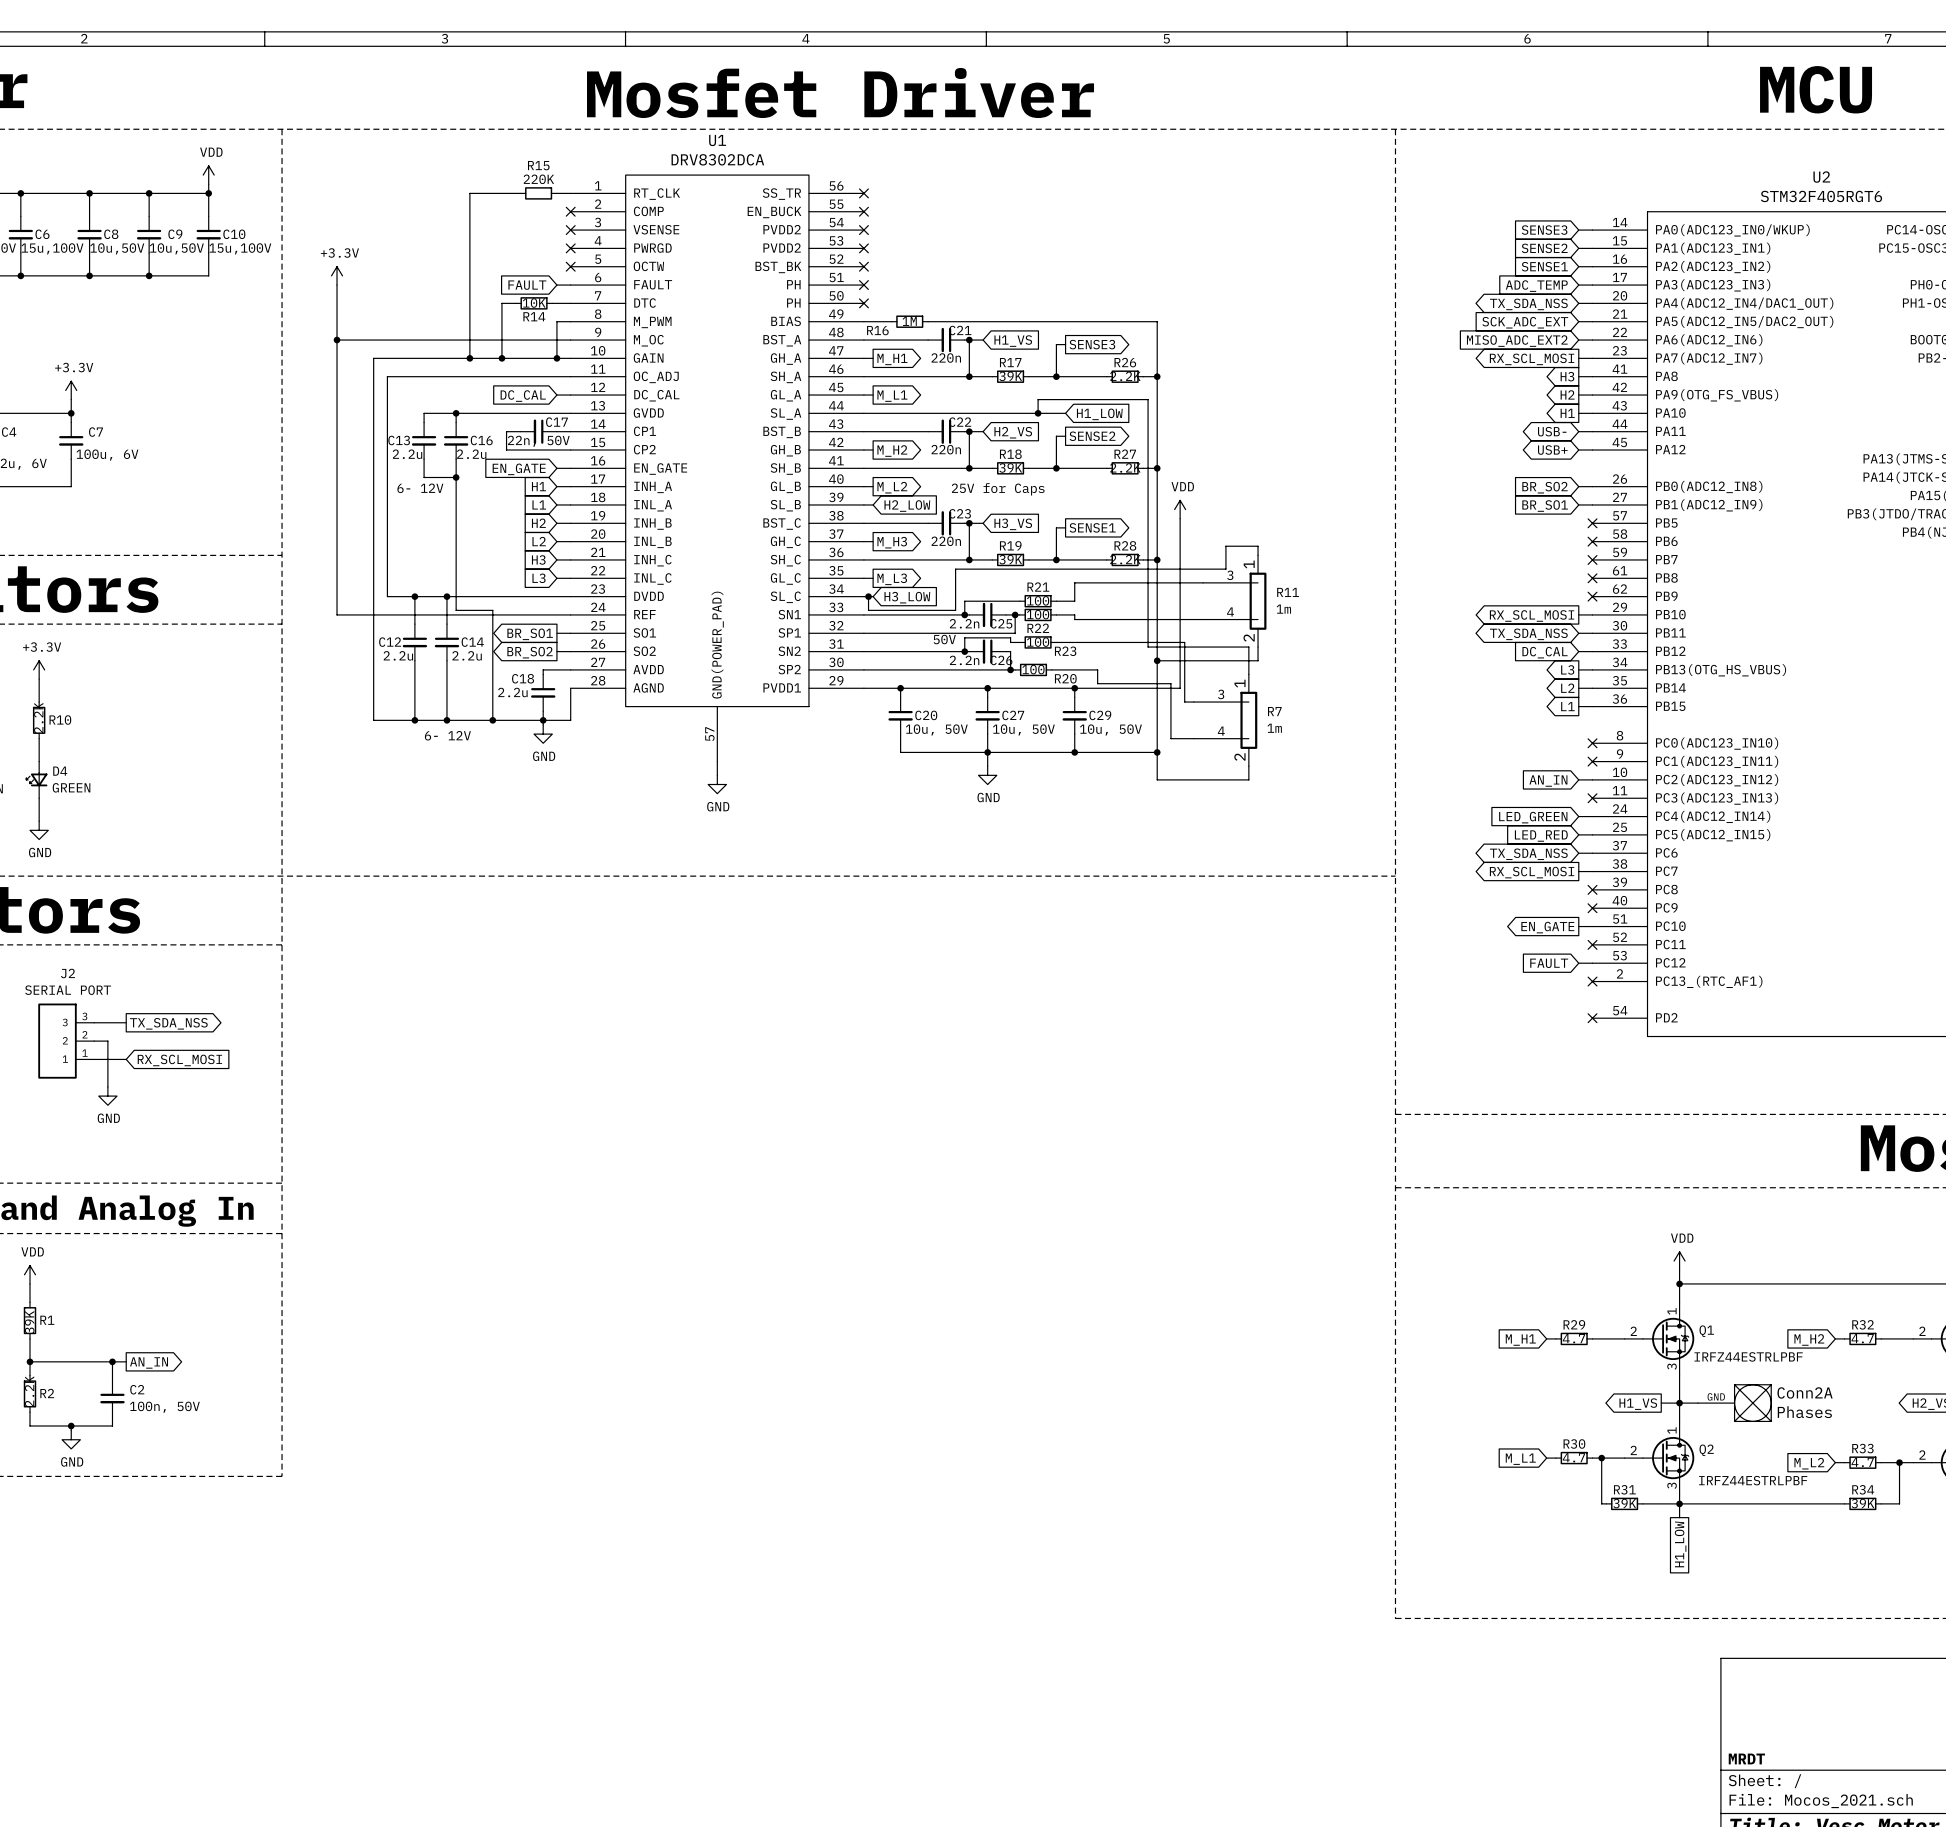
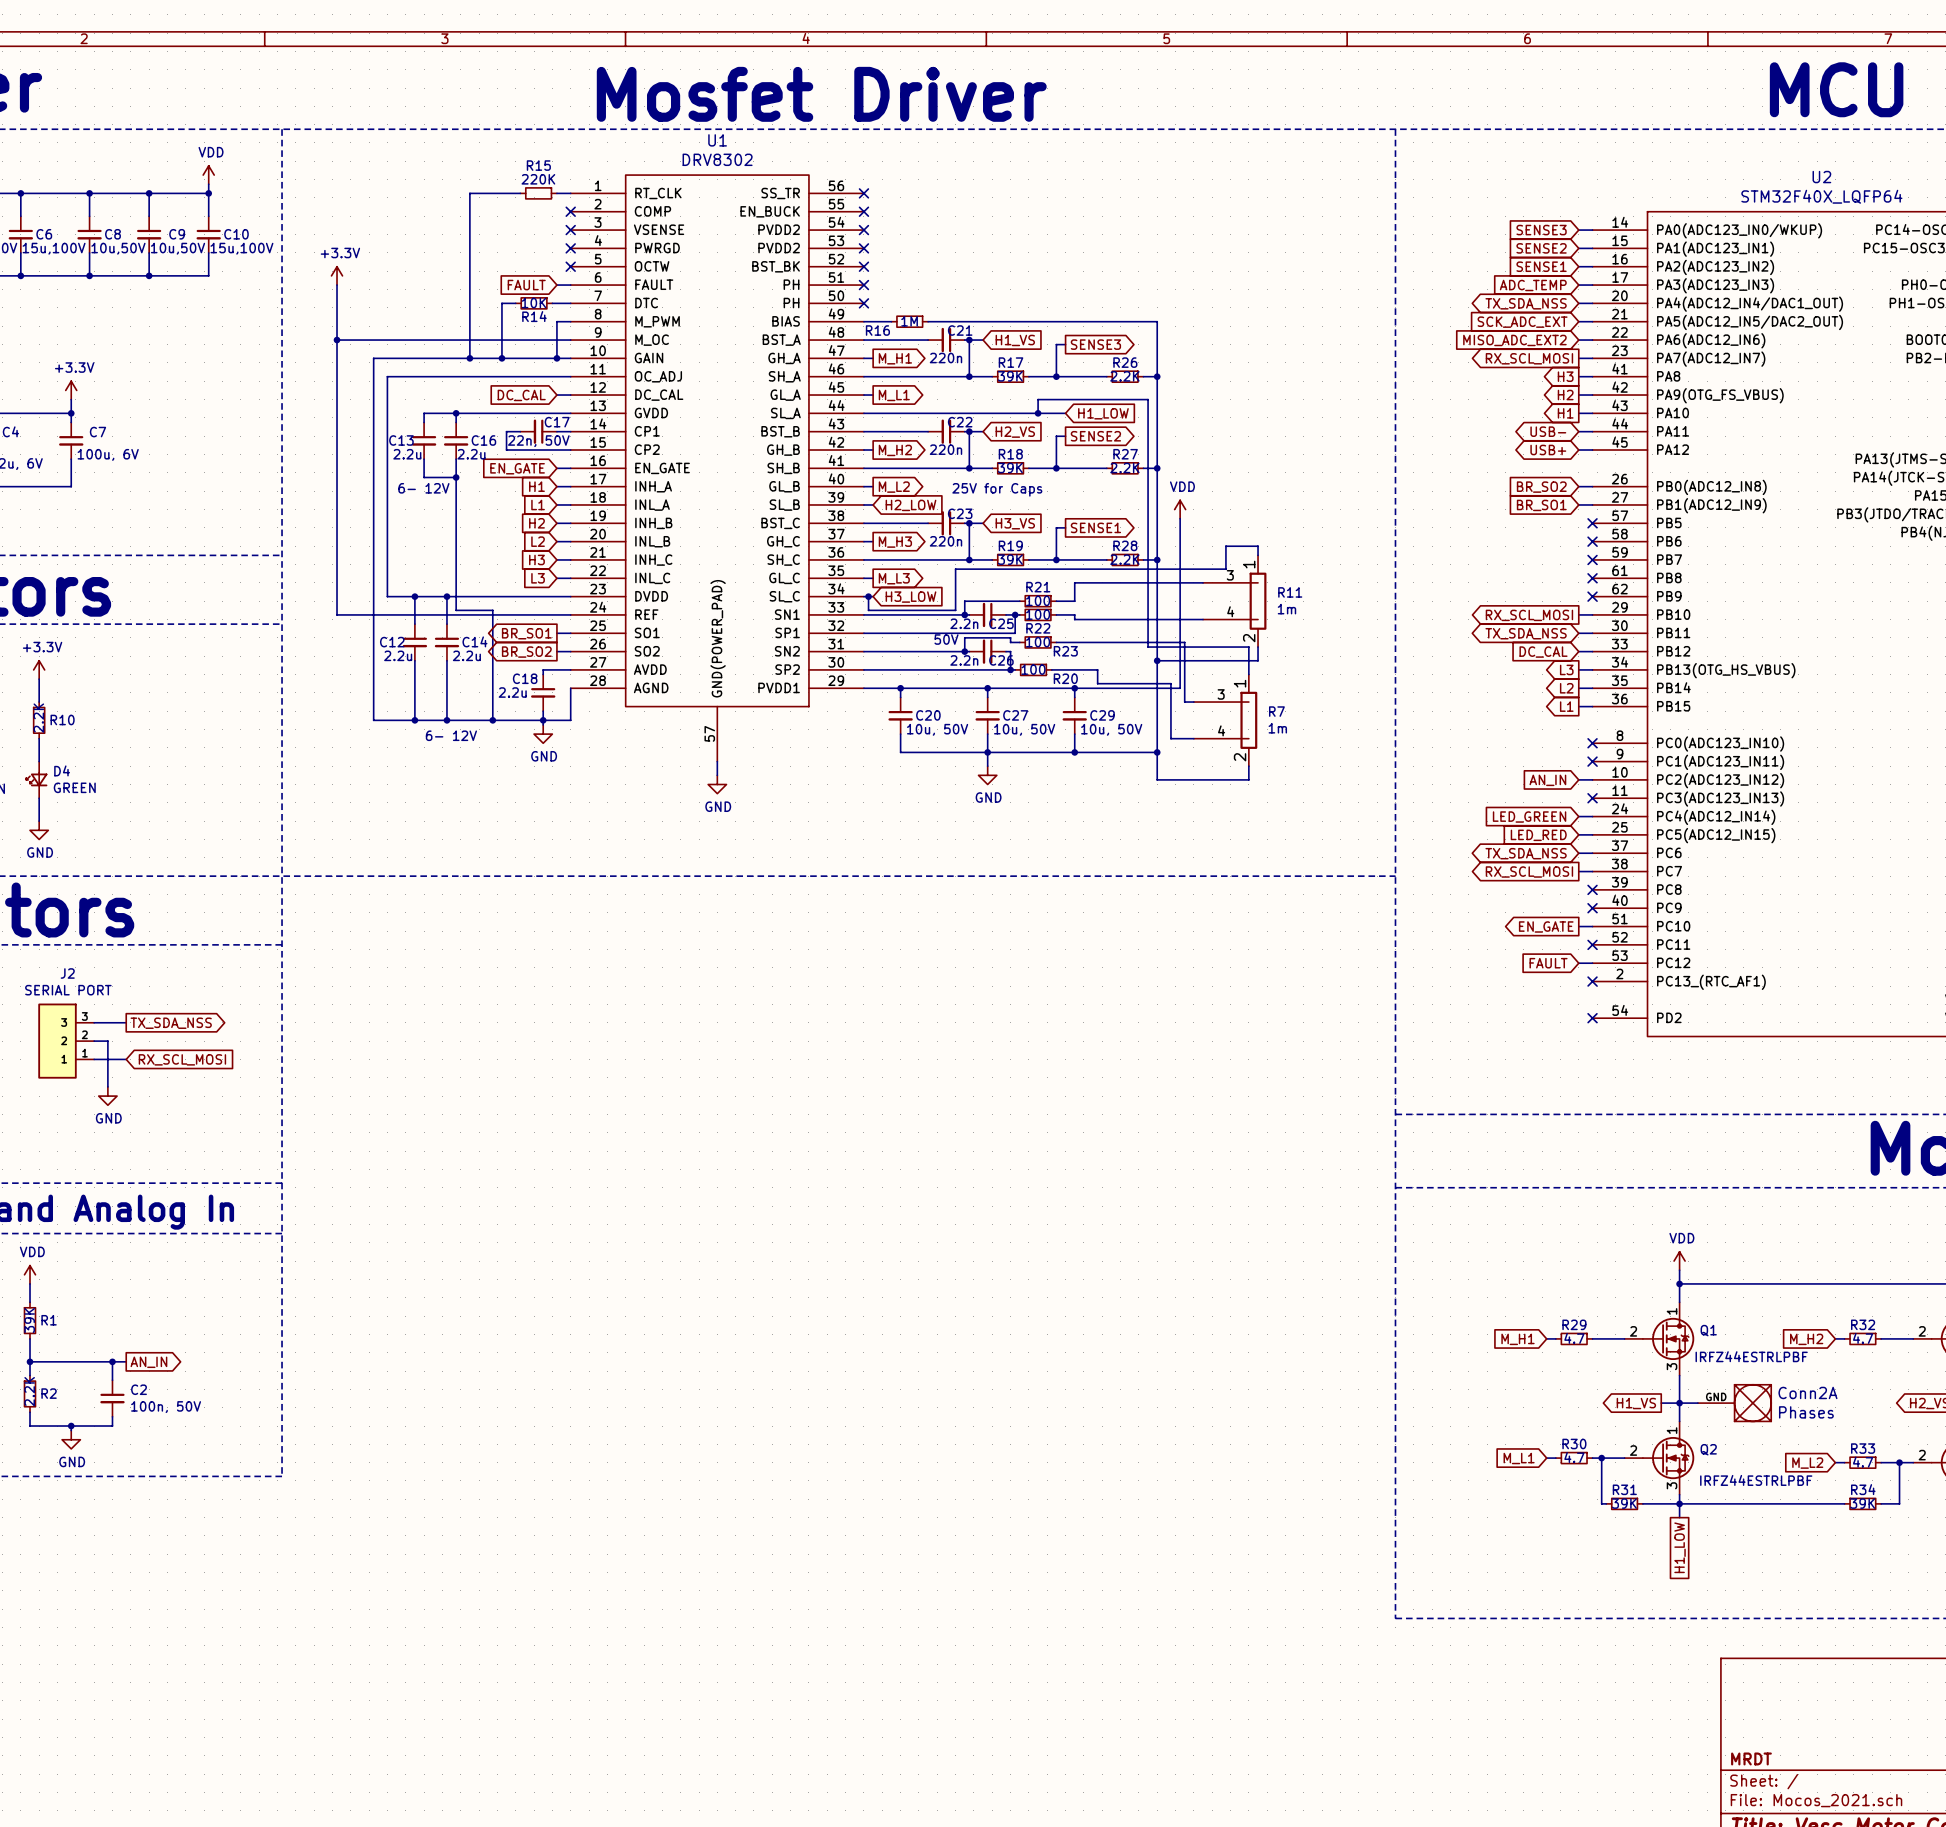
U1 value: DRV8302DCA (717, 159) -> DRV8302 (717, 159)
U2 value: STM32F405RGT6 (1821, 196) -> STM32F40X_LQFP64 (1821, 196)

